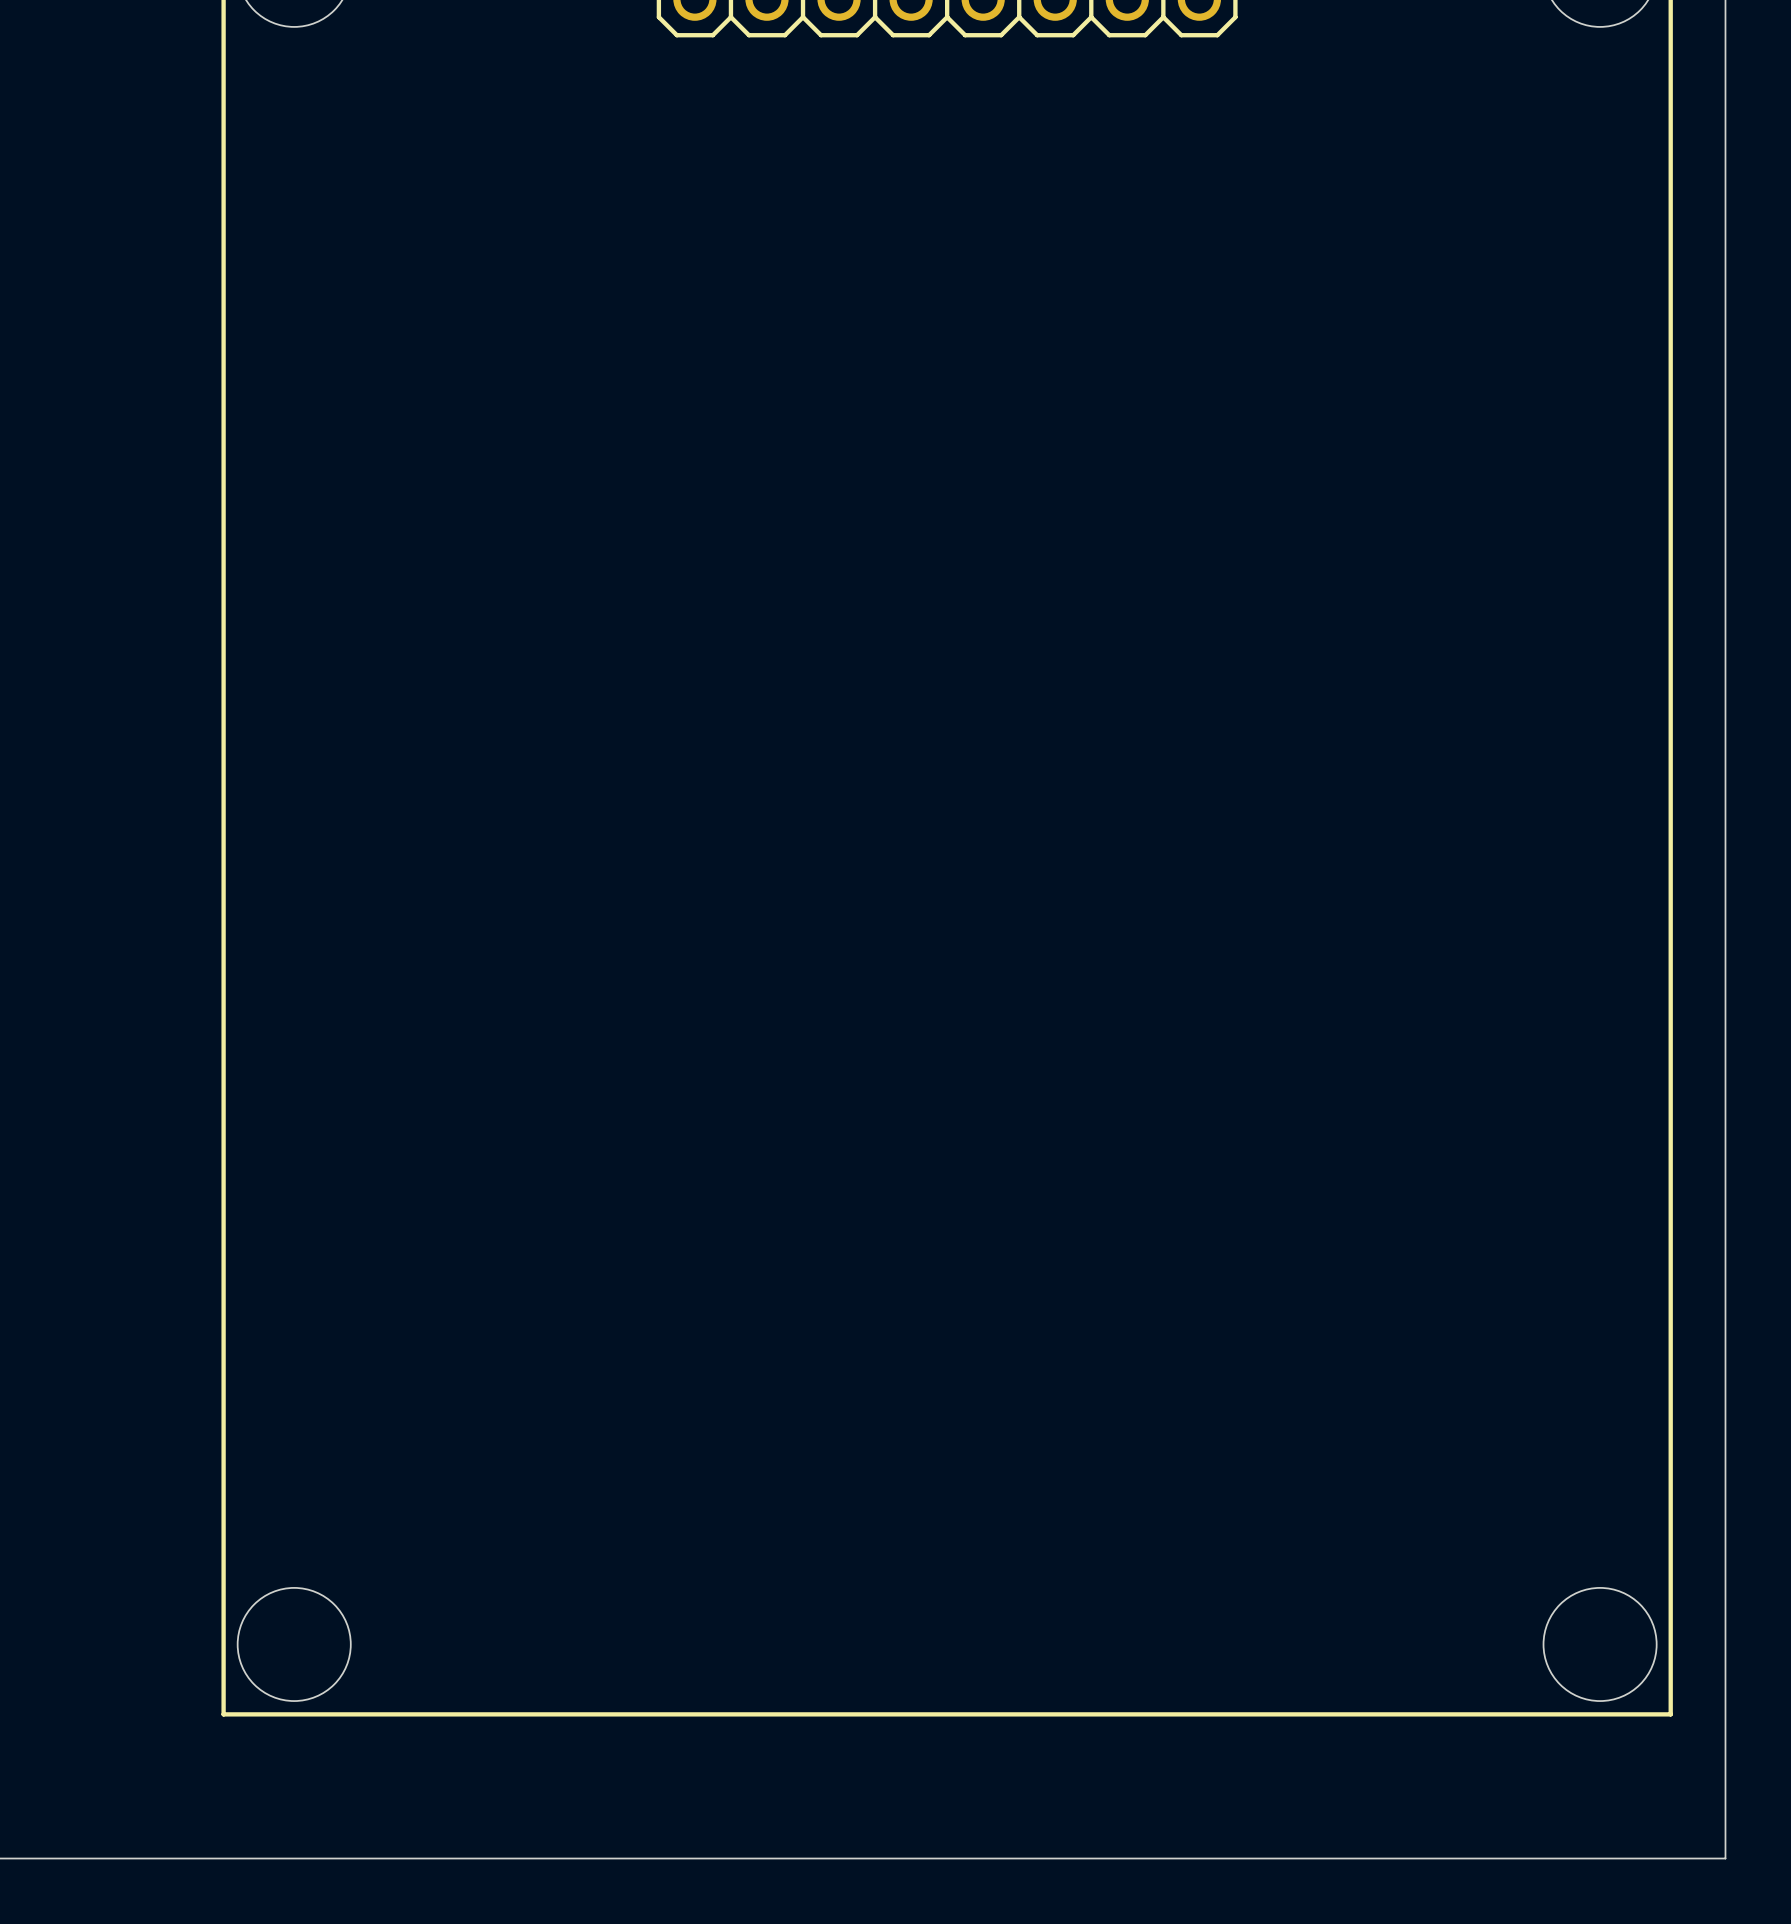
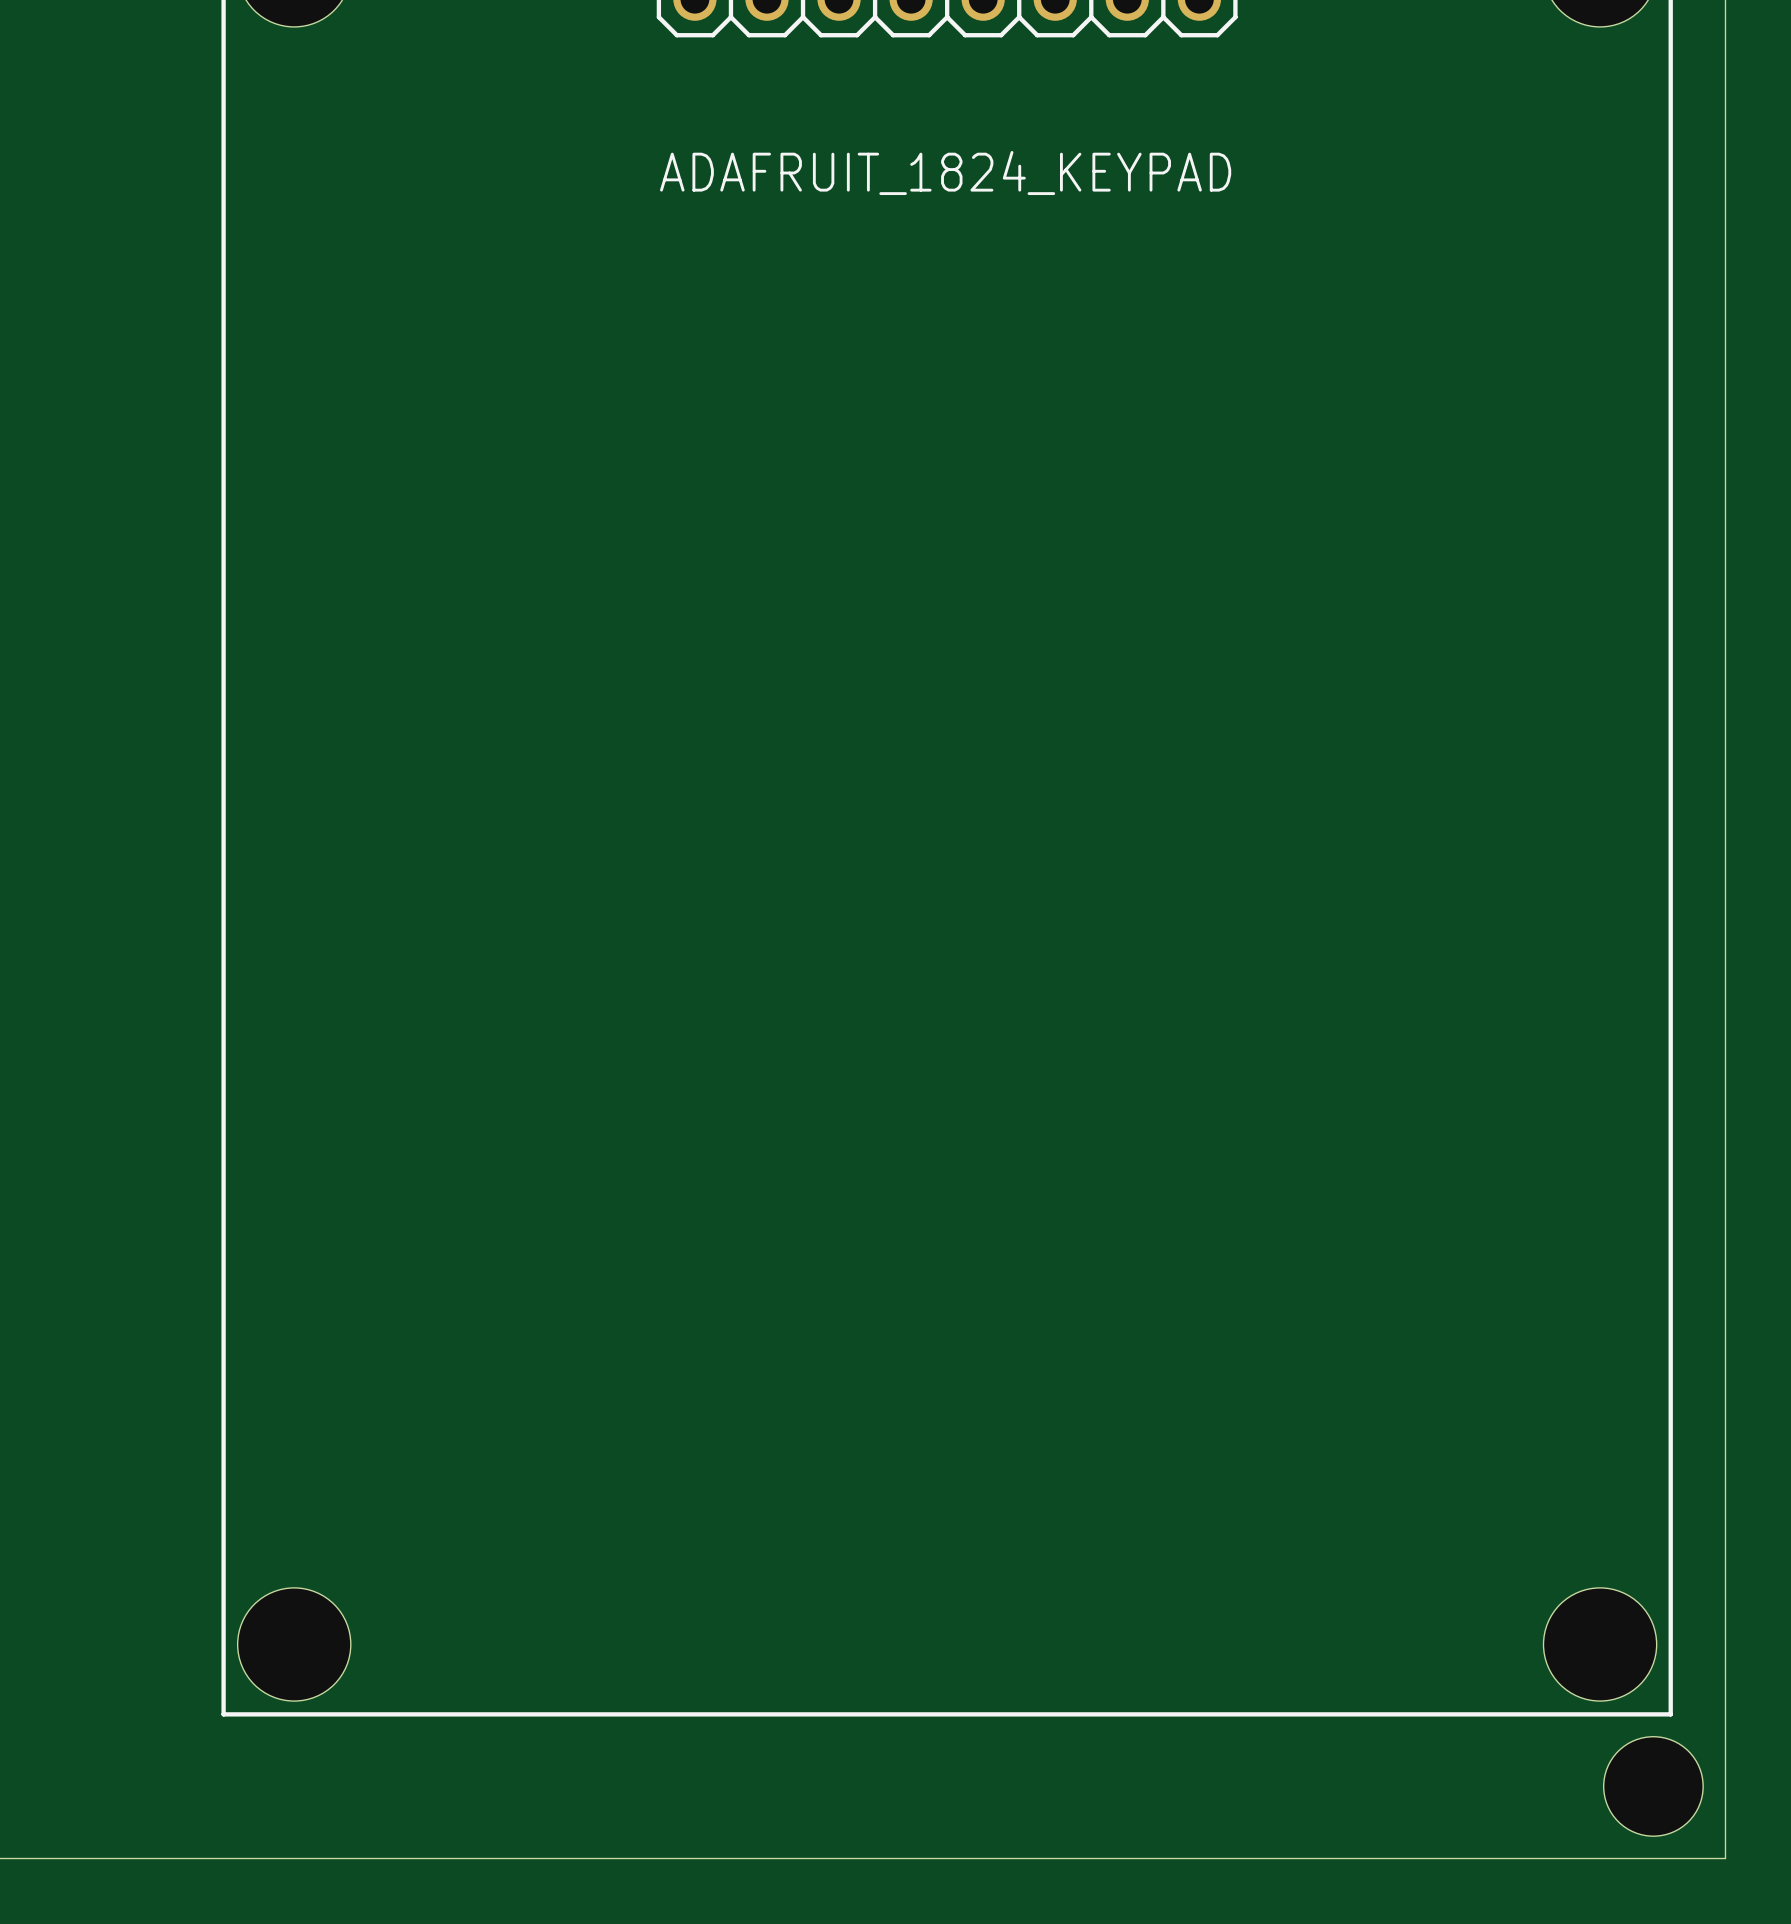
part value: none -> ADAFRUIT_1824_KEYPAD (945, 173)
hole: none -> (1653, 1786)

